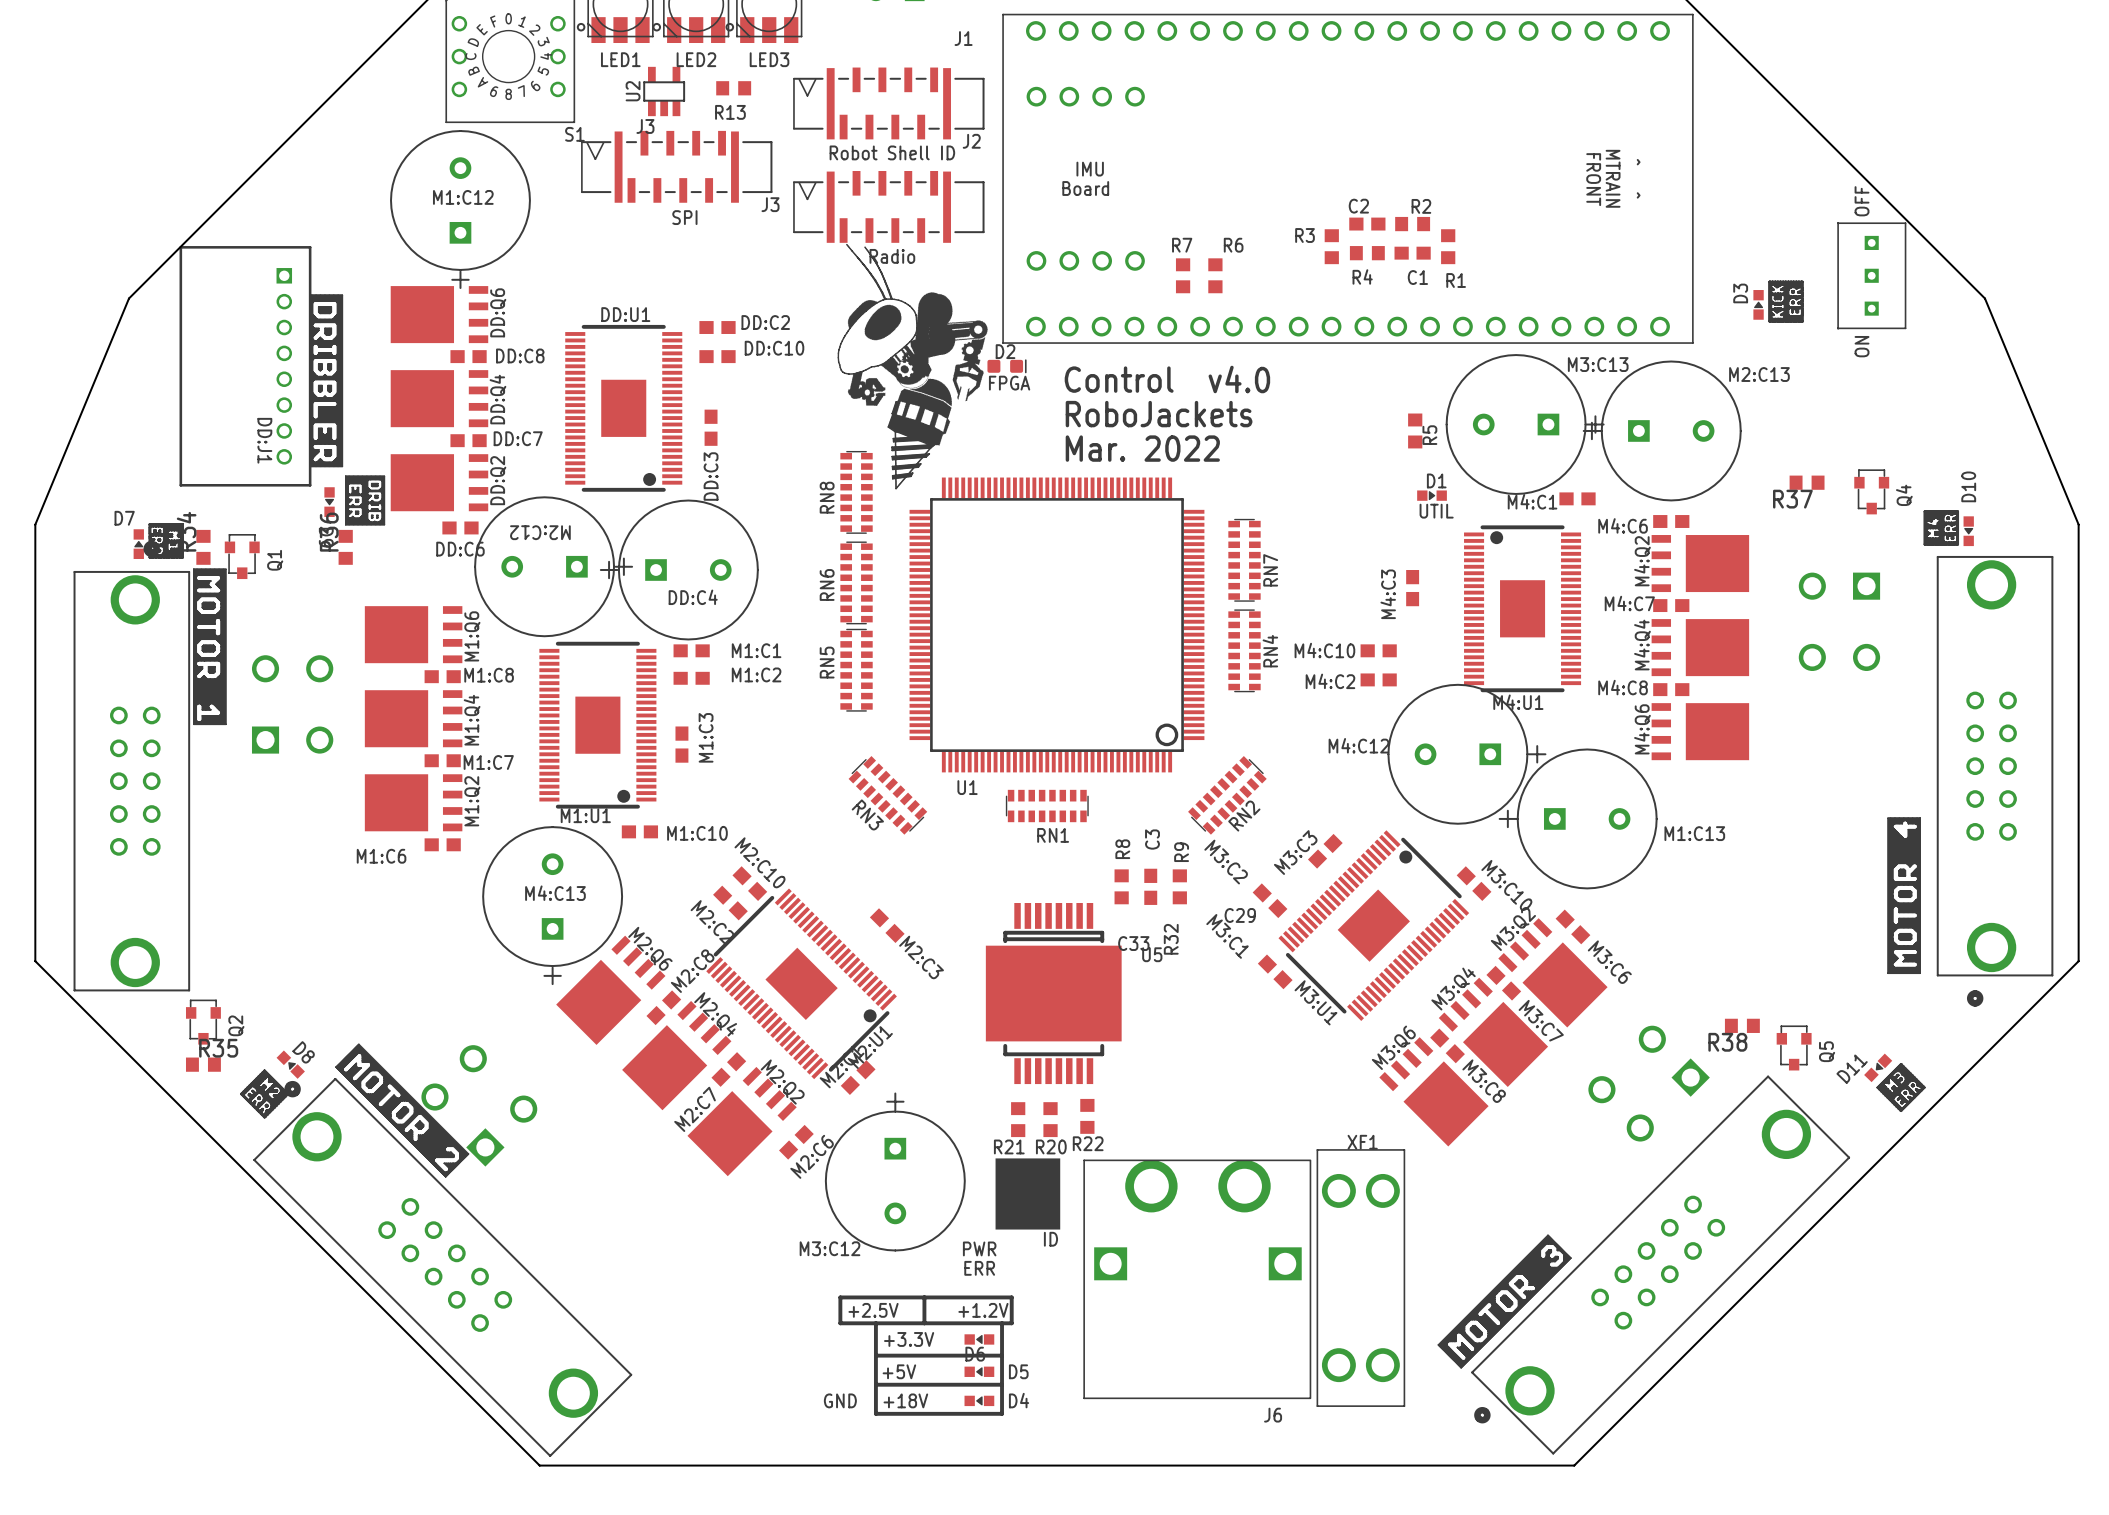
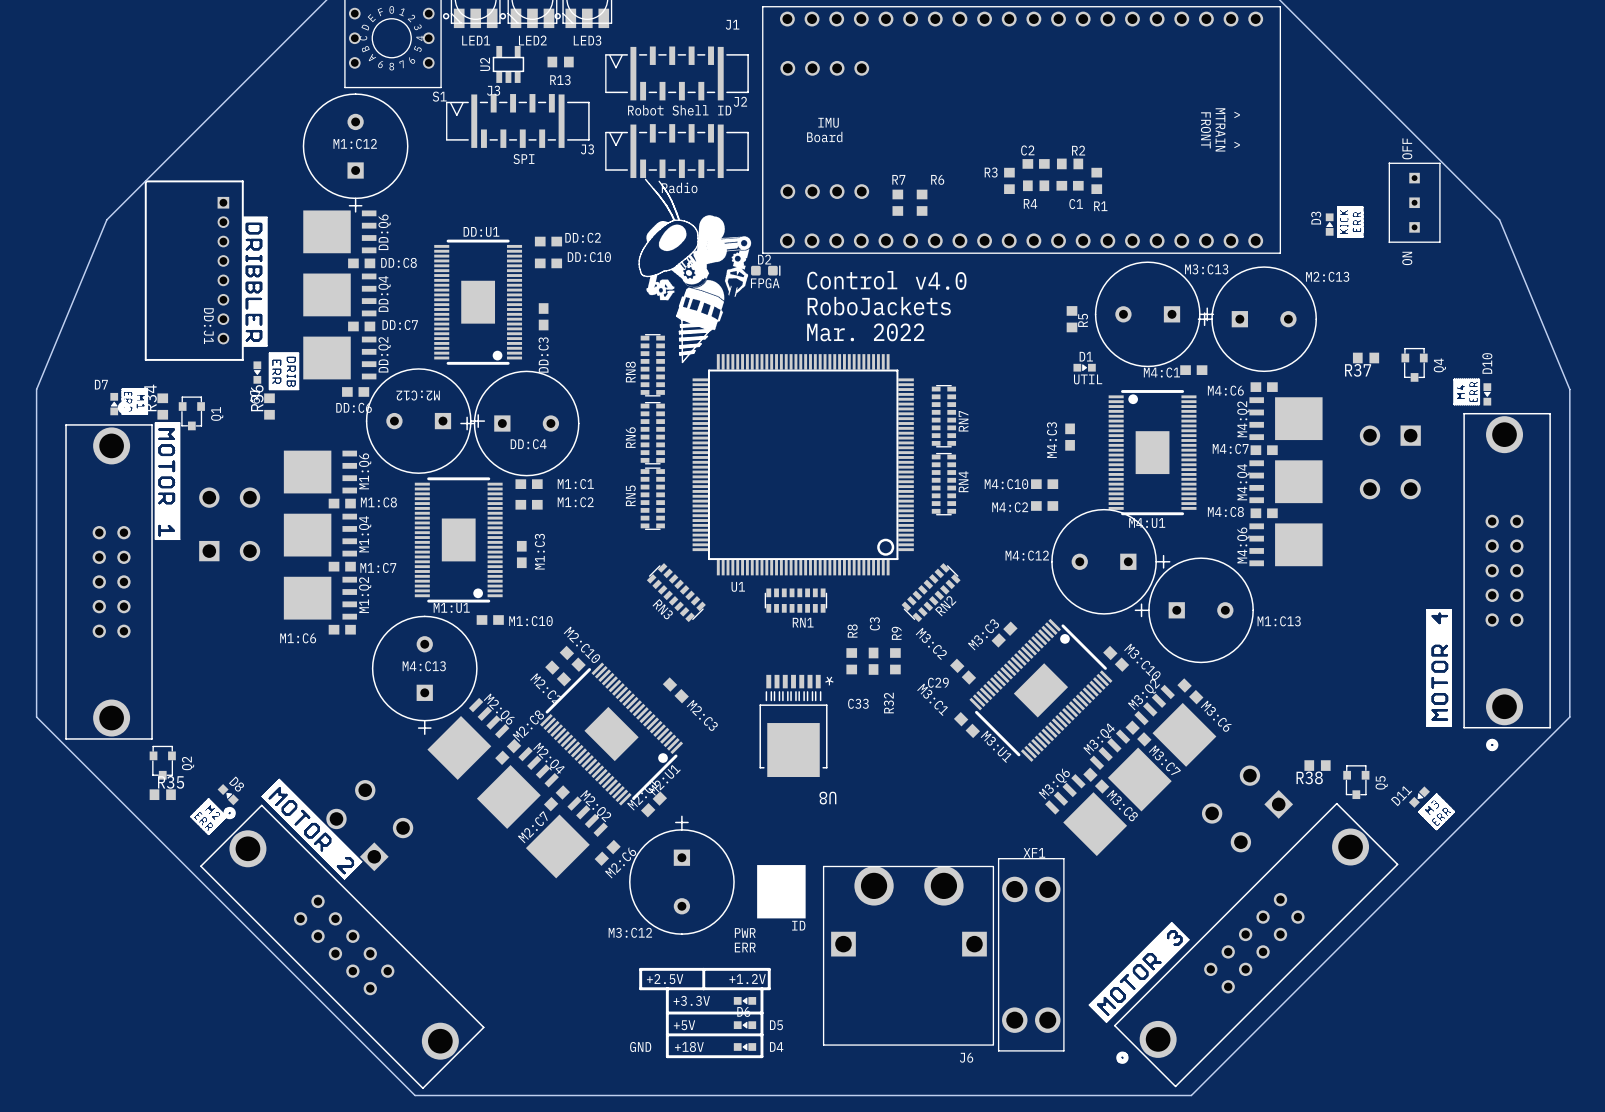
U8: none -> (793, 725)
U5: (1053, 993) -> none
R22: (1087, 1116) -> none
R21: (1018, 1119) -> none
R20: (1050, 1119) -> none

